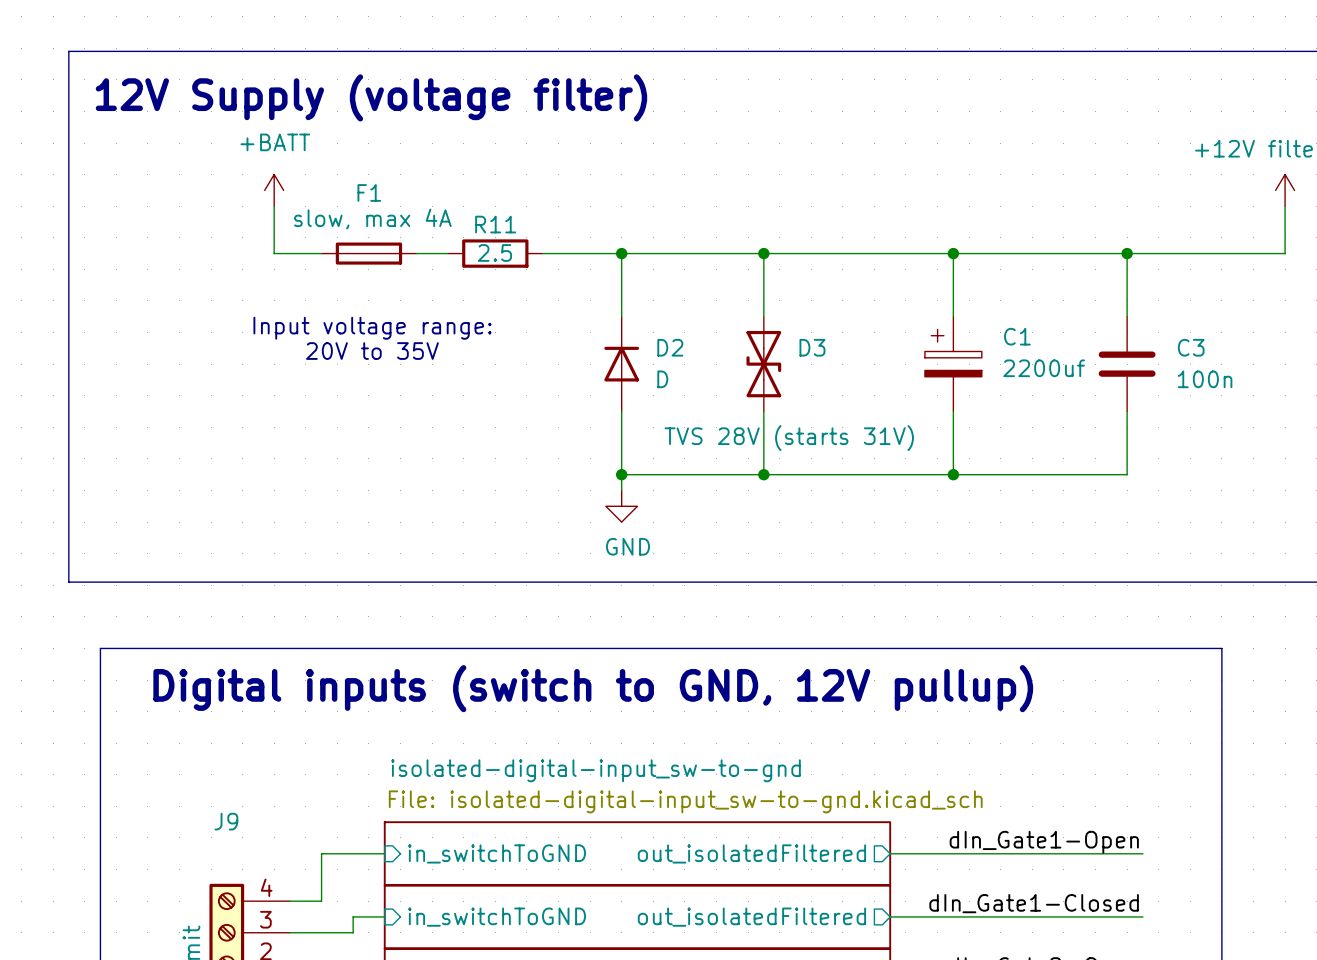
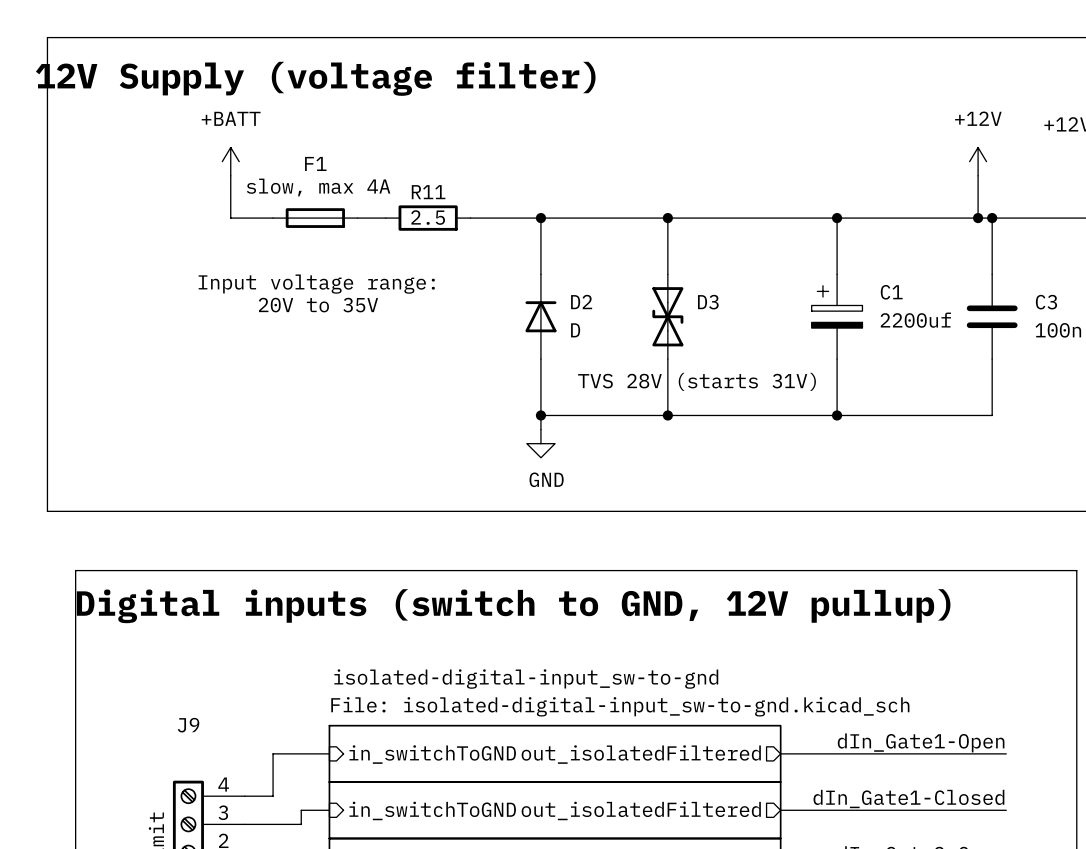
power symbol: none -> +12V (978, 161)
wire: none -> (978, 175) (978, 218)
junction: none -> (978, 218)

